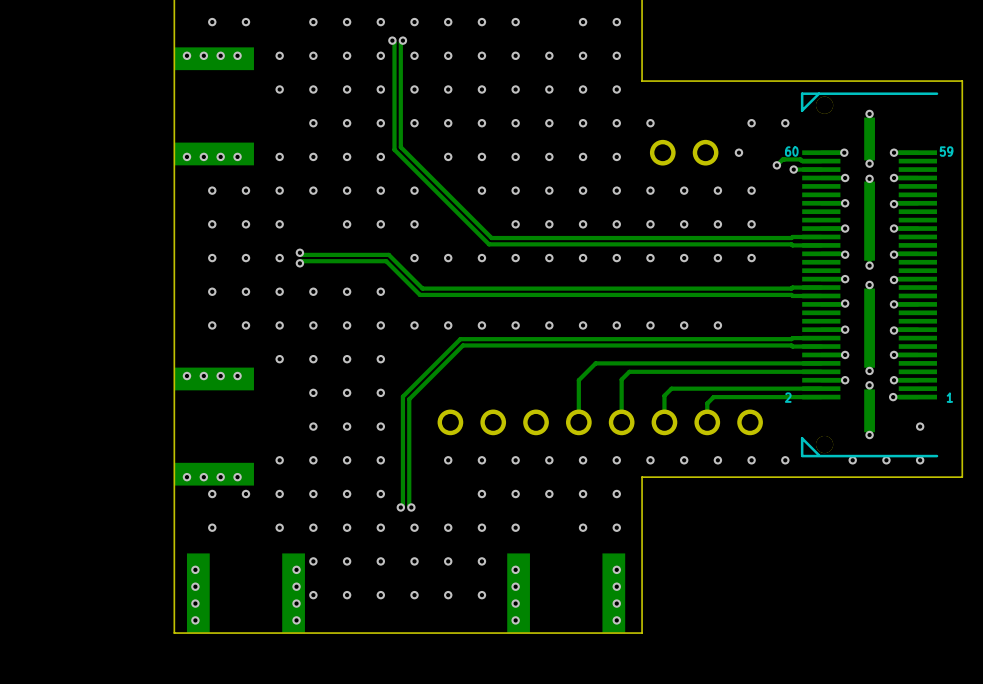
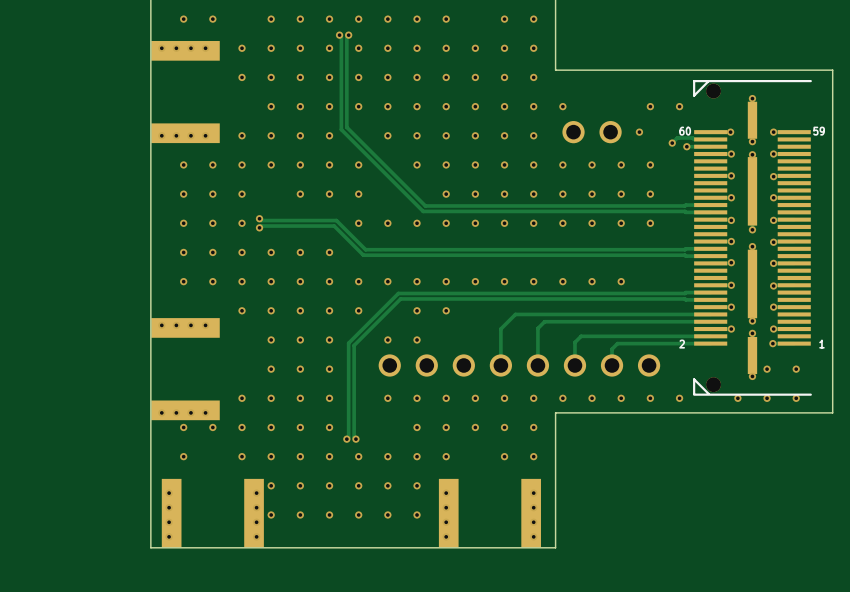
via: none -> (358, 310)
via: none -> (417, 310)
via: none -> (446, 310)
via: none -> (387, 339)
via: none -> (417, 339)
via: none -> (767, 369)

